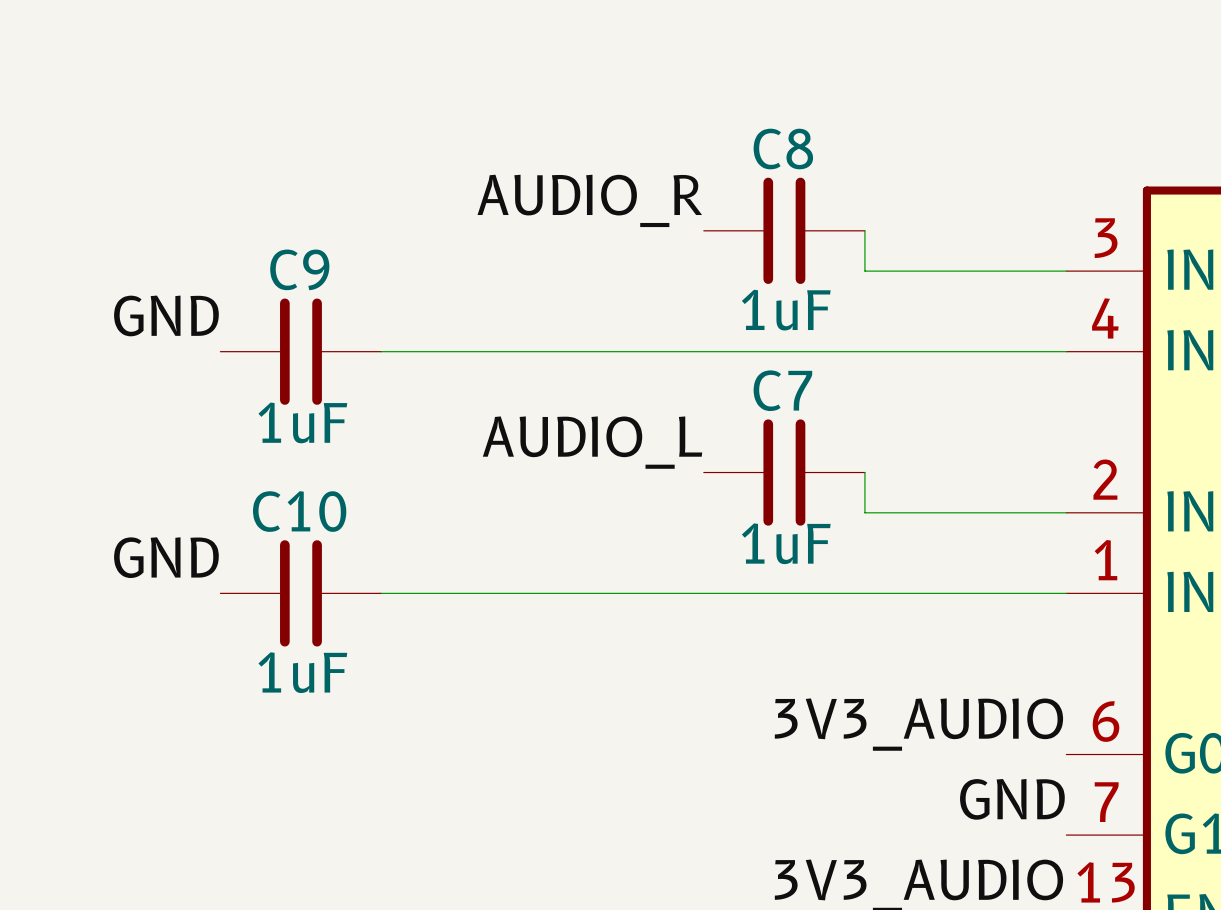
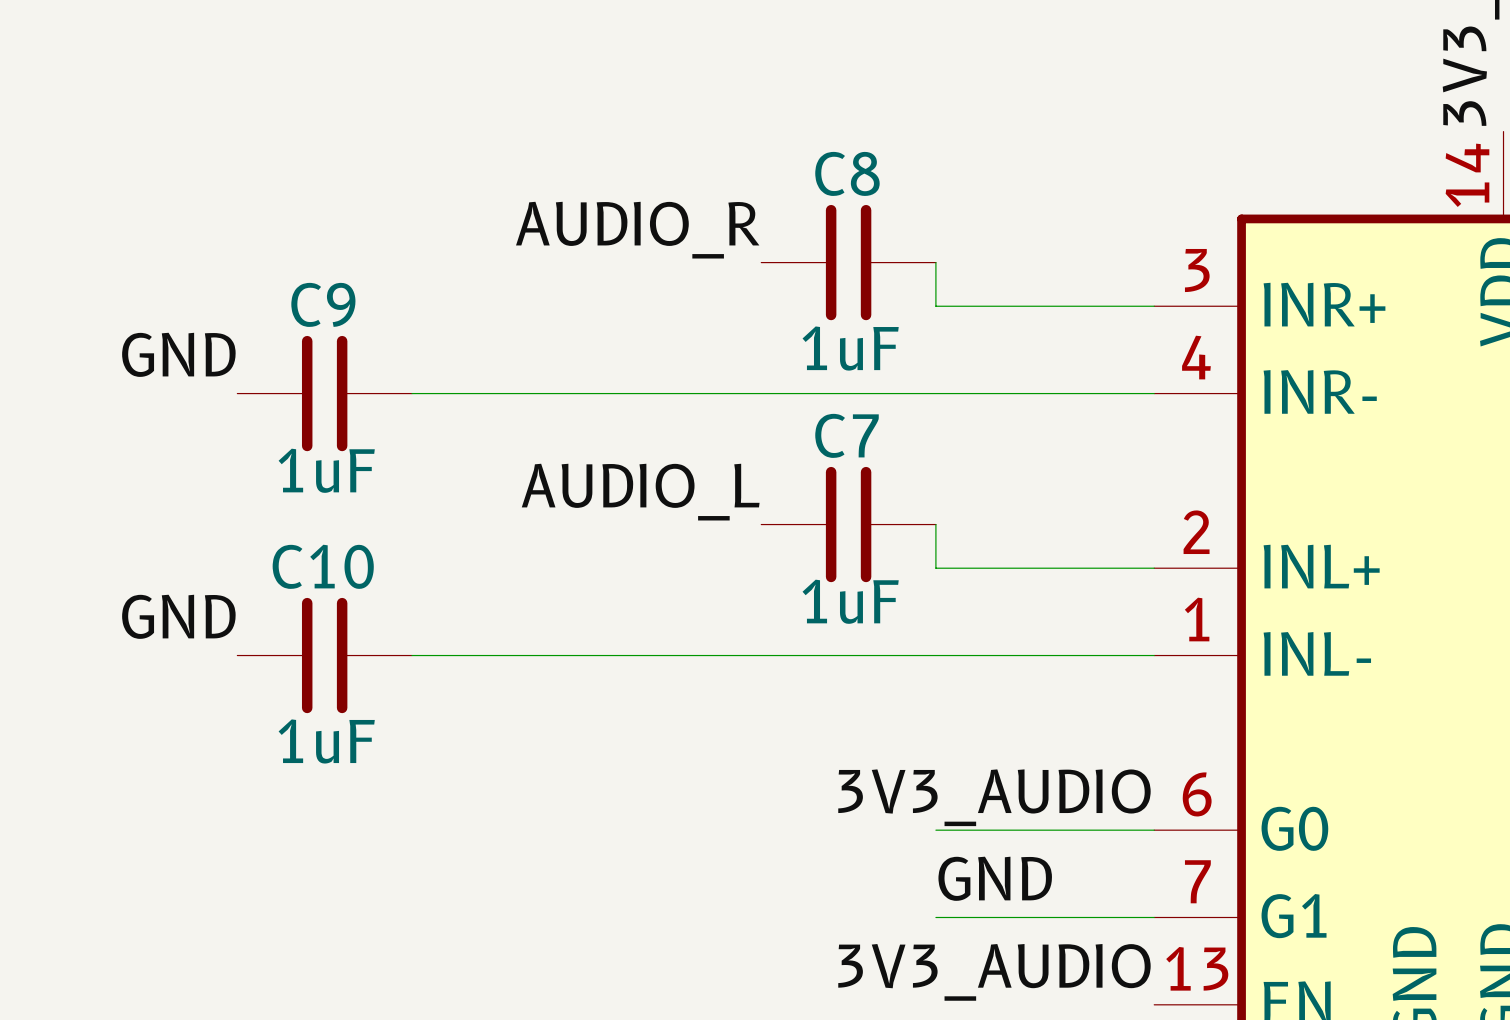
wire: none -> (935, 830) (1154, 830)
label position: GND (1012, 799) -> GND (995, 878)
wire: none -> (935, 917) (1154, 917)

